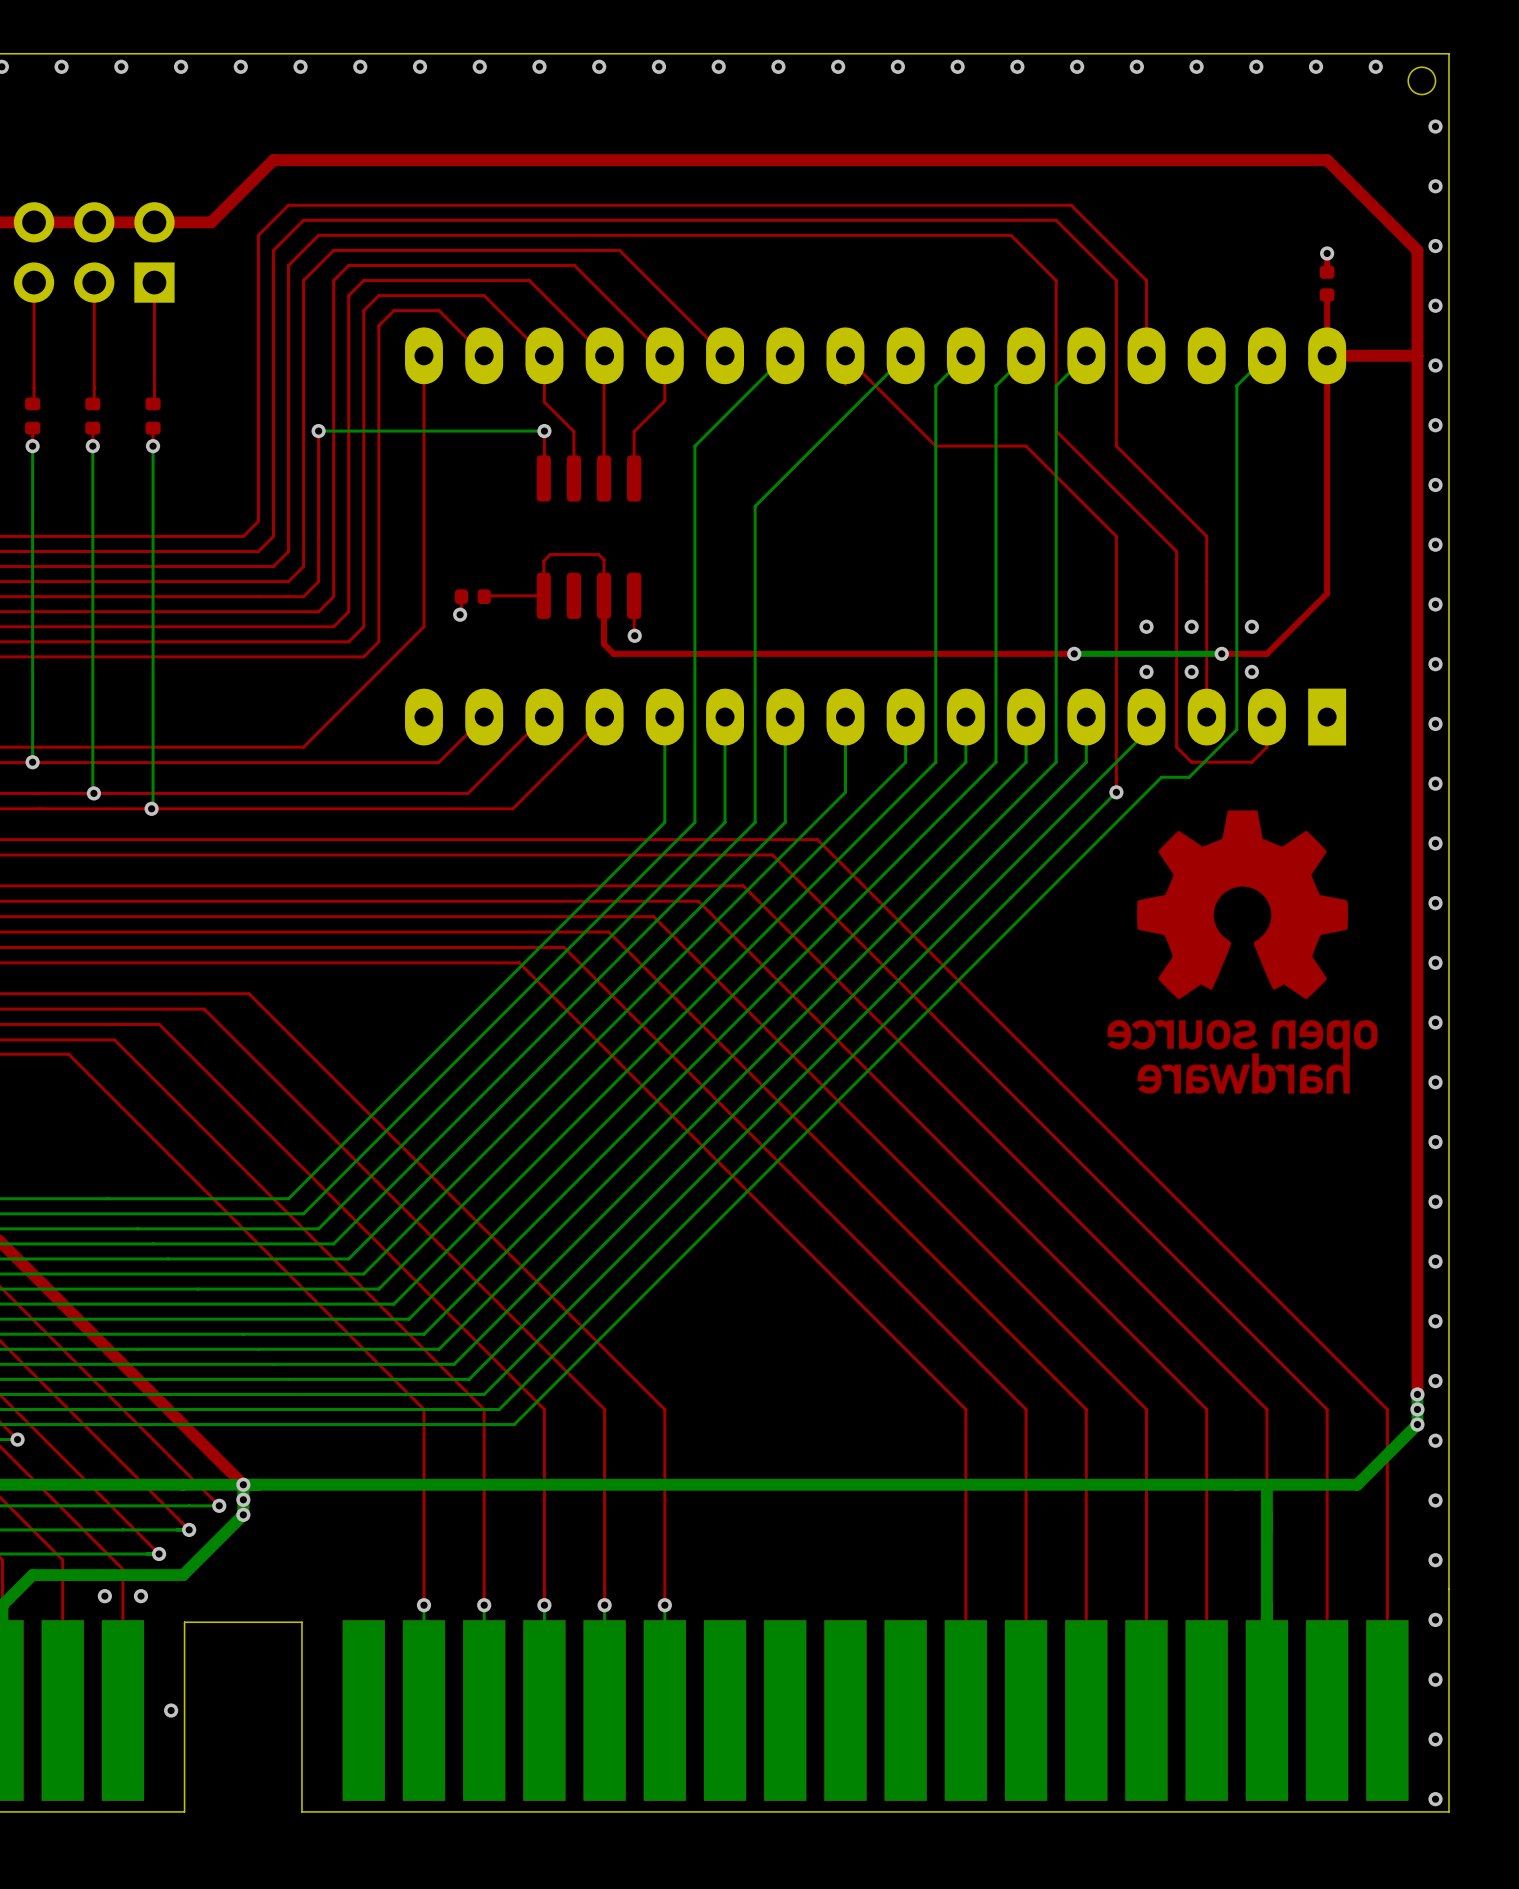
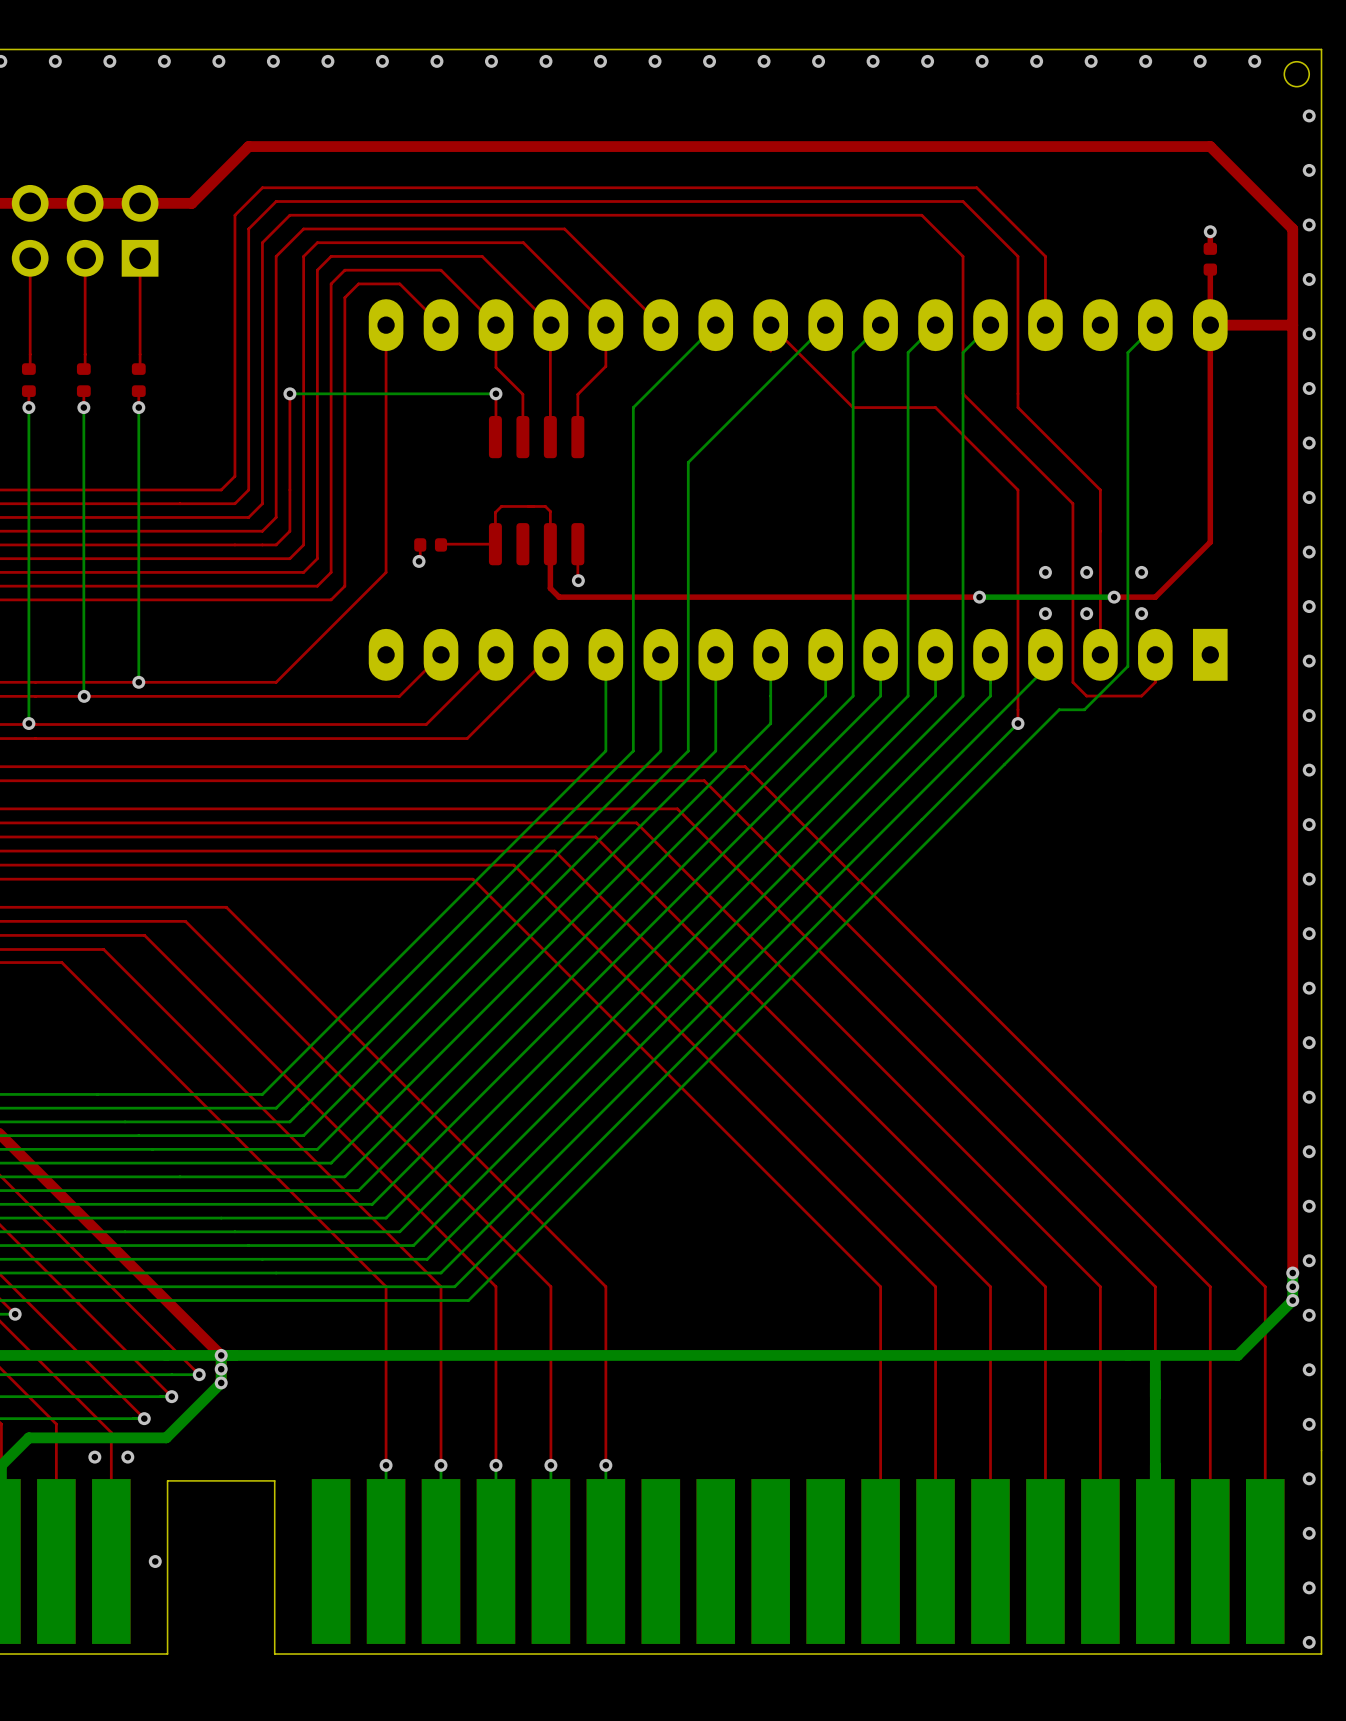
bottom track: (153, 747) (151, 808) -> none
via: none -> (138, 682)
bottom track: none -> (28, 696) (28, 723)
via: (32, 762) -> none
bottom track: (92, 762) (93, 793) -> none
via: none -> (84, 696)
via: none -> (28, 723)
via: (93, 793) -> none
via: (151, 808) -> none
drawing: [1107, 810, 1378, 1094] -> none

